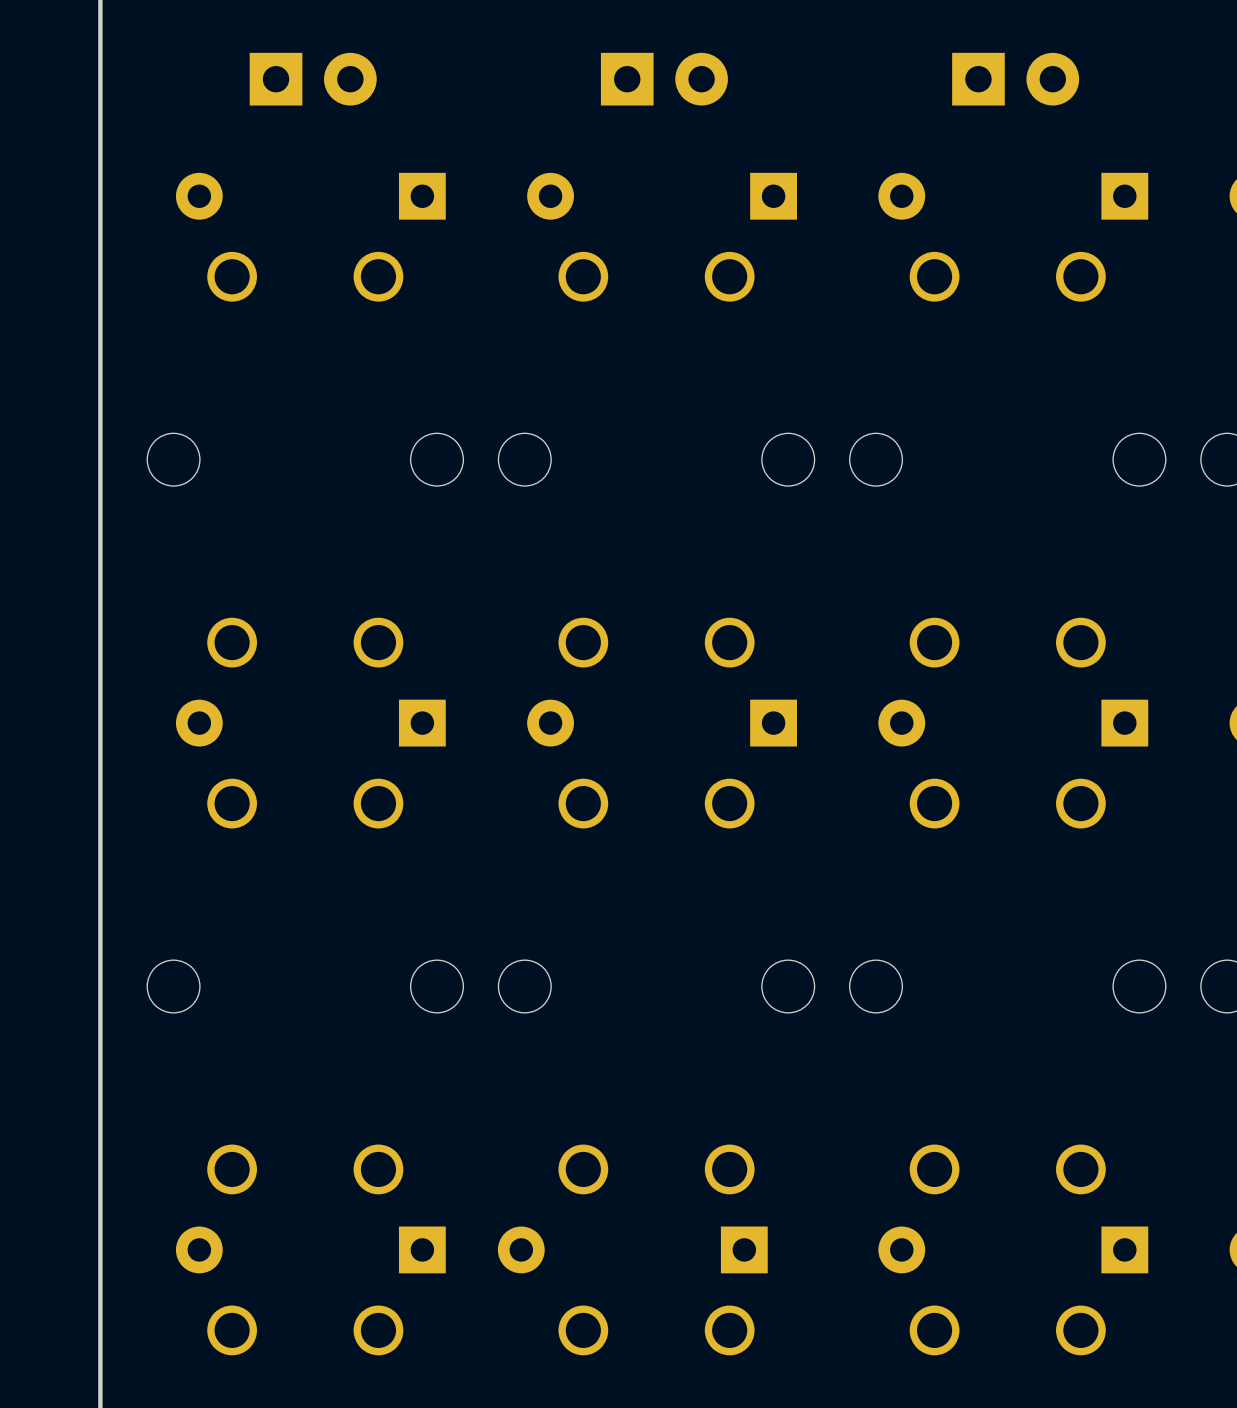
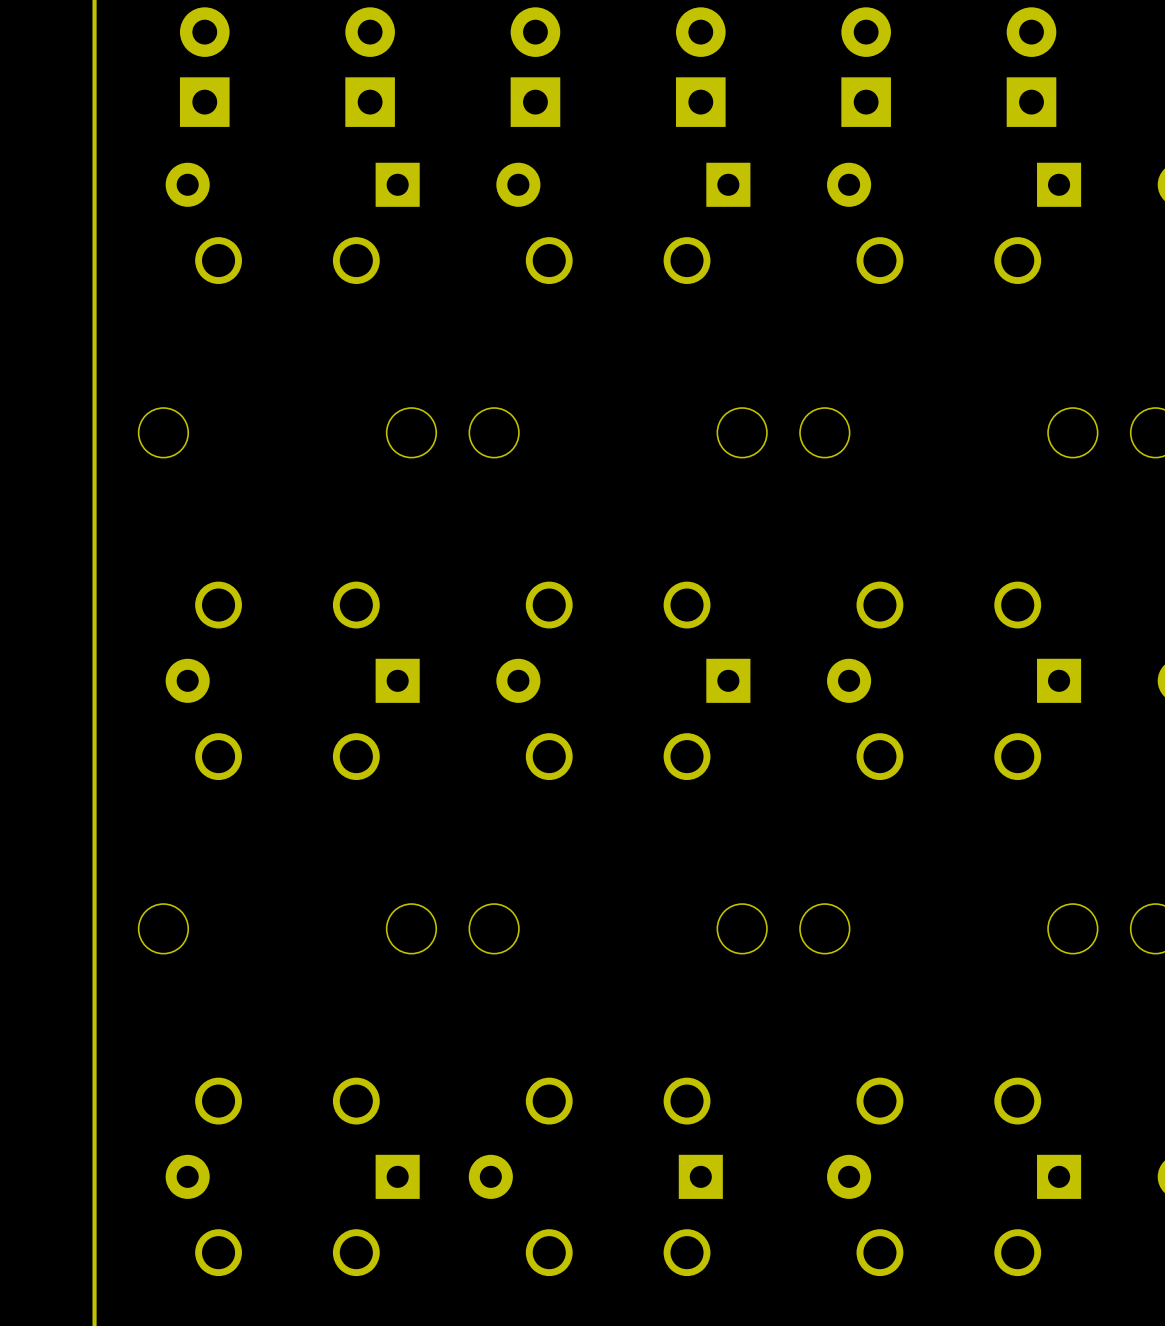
part: none -> (204, 67)
part: none -> (370, 67)
part: none -> (535, 67)
part: none -> (700, 67)
part: none -> (866, 67)
part: none -> (1031, 67)
part: (313, 79) -> none
part: (664, 79) -> none
part: (1015, 79) -> none

